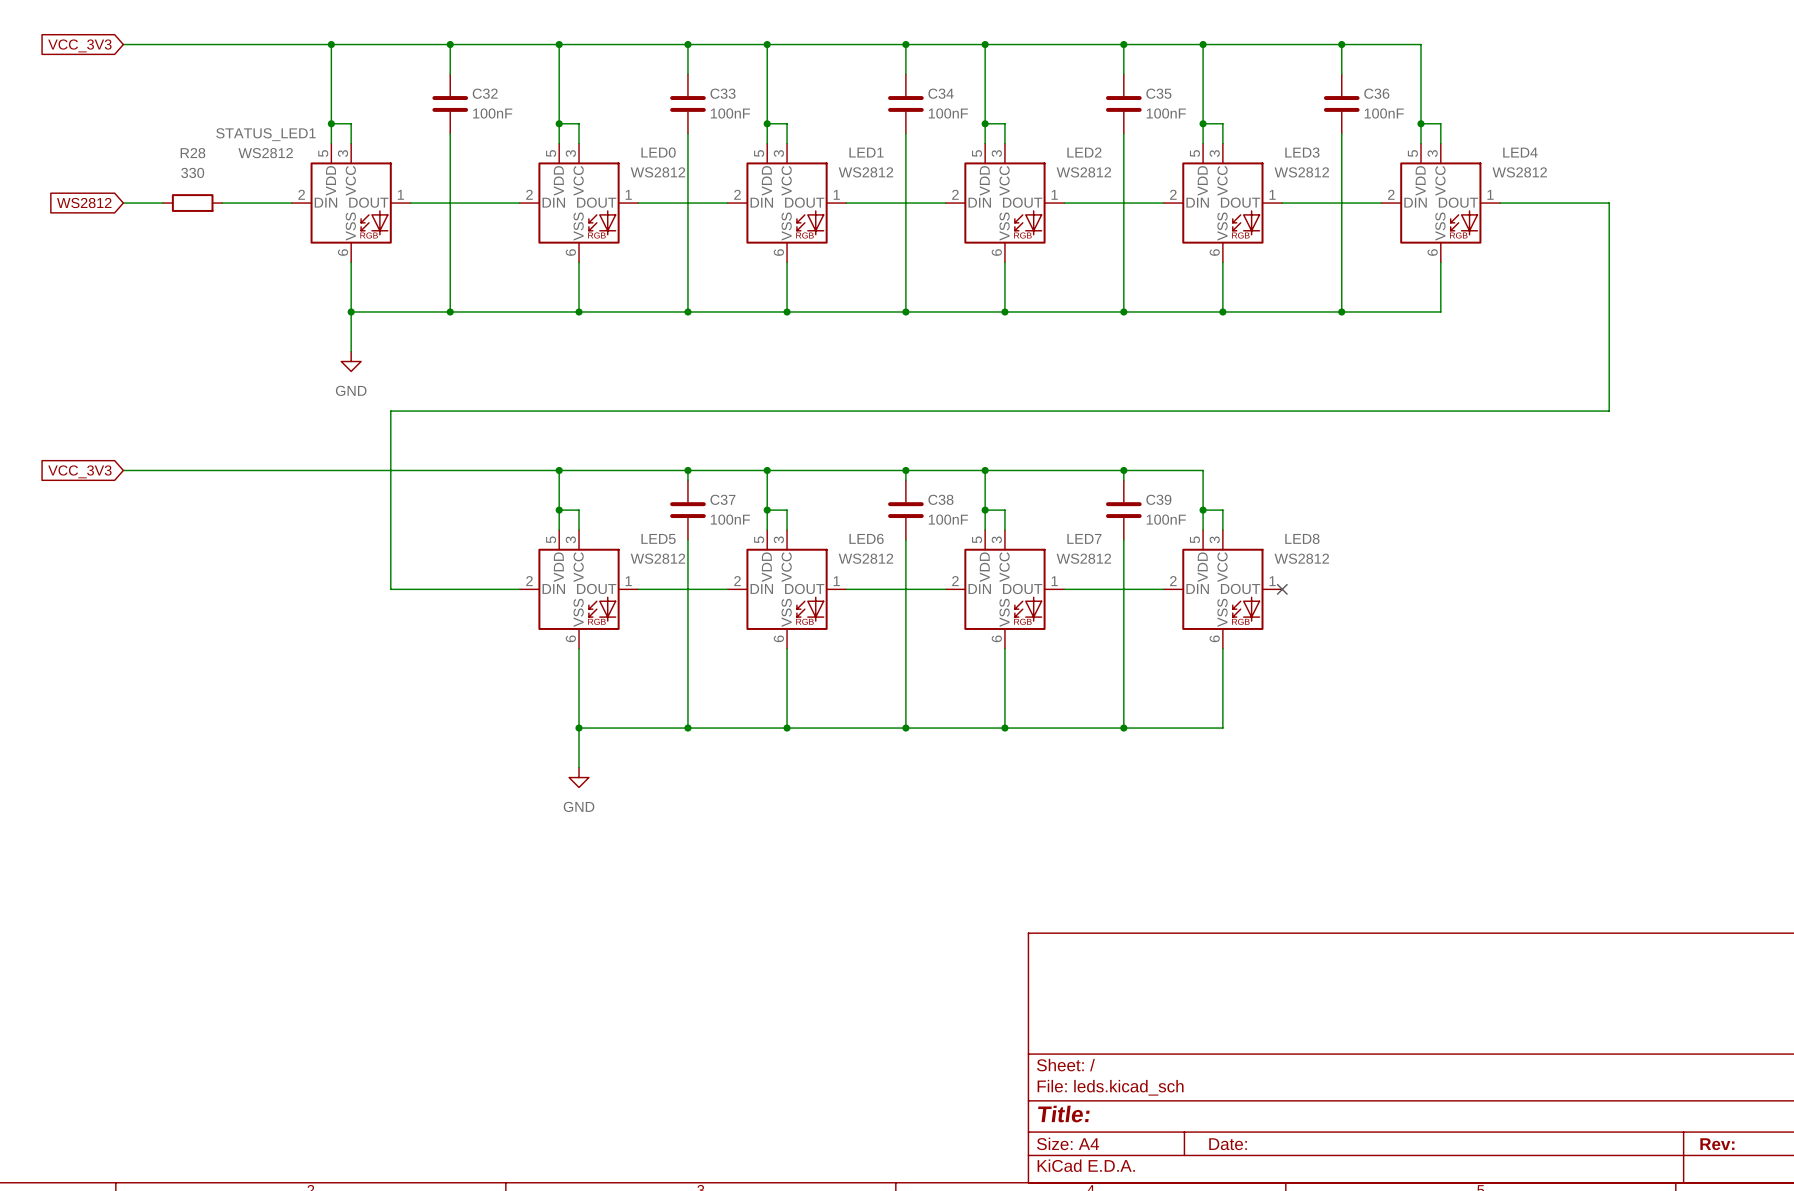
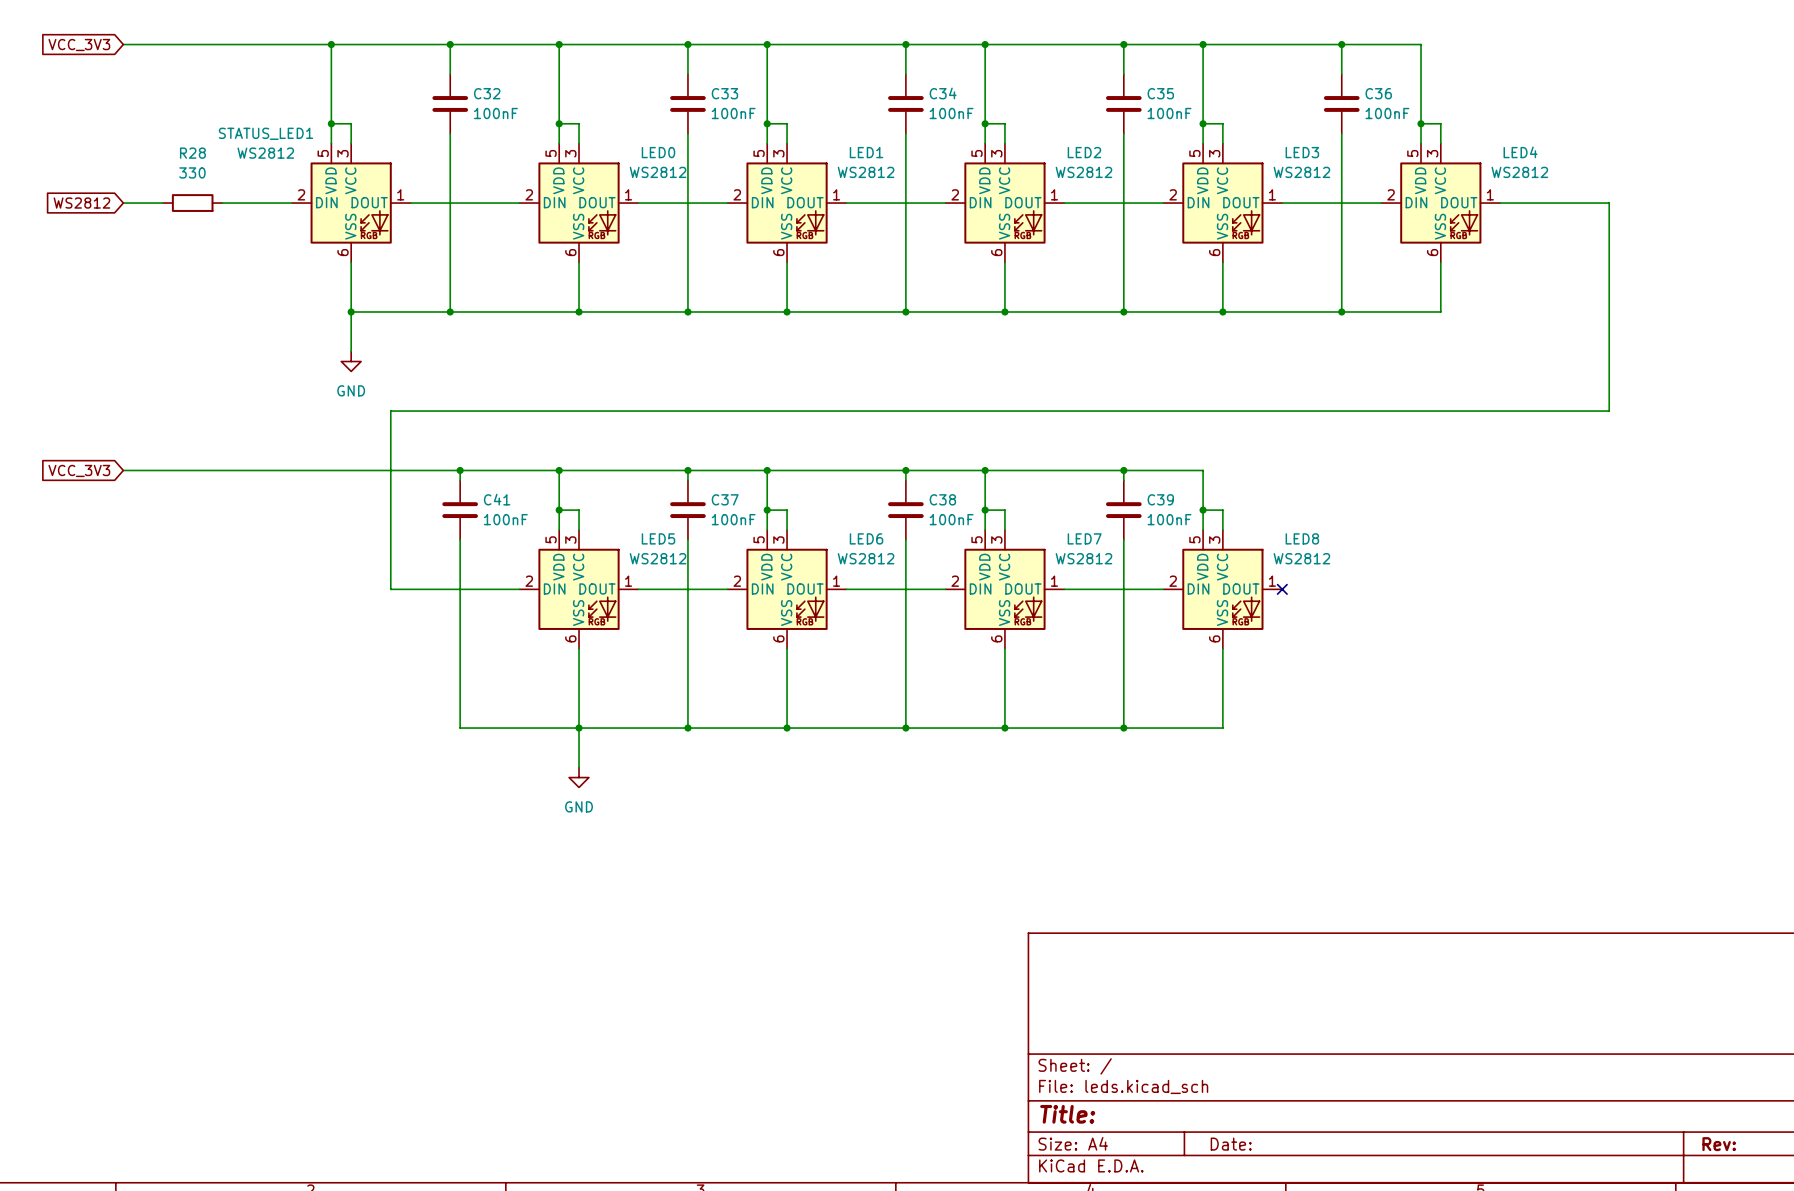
wire: none -> (460, 470) (460, 480)
junction: none -> (460, 470)
C41: none -> 100nF (460, 510)
wire: none -> (460, 539) (460, 728) (579, 728)

